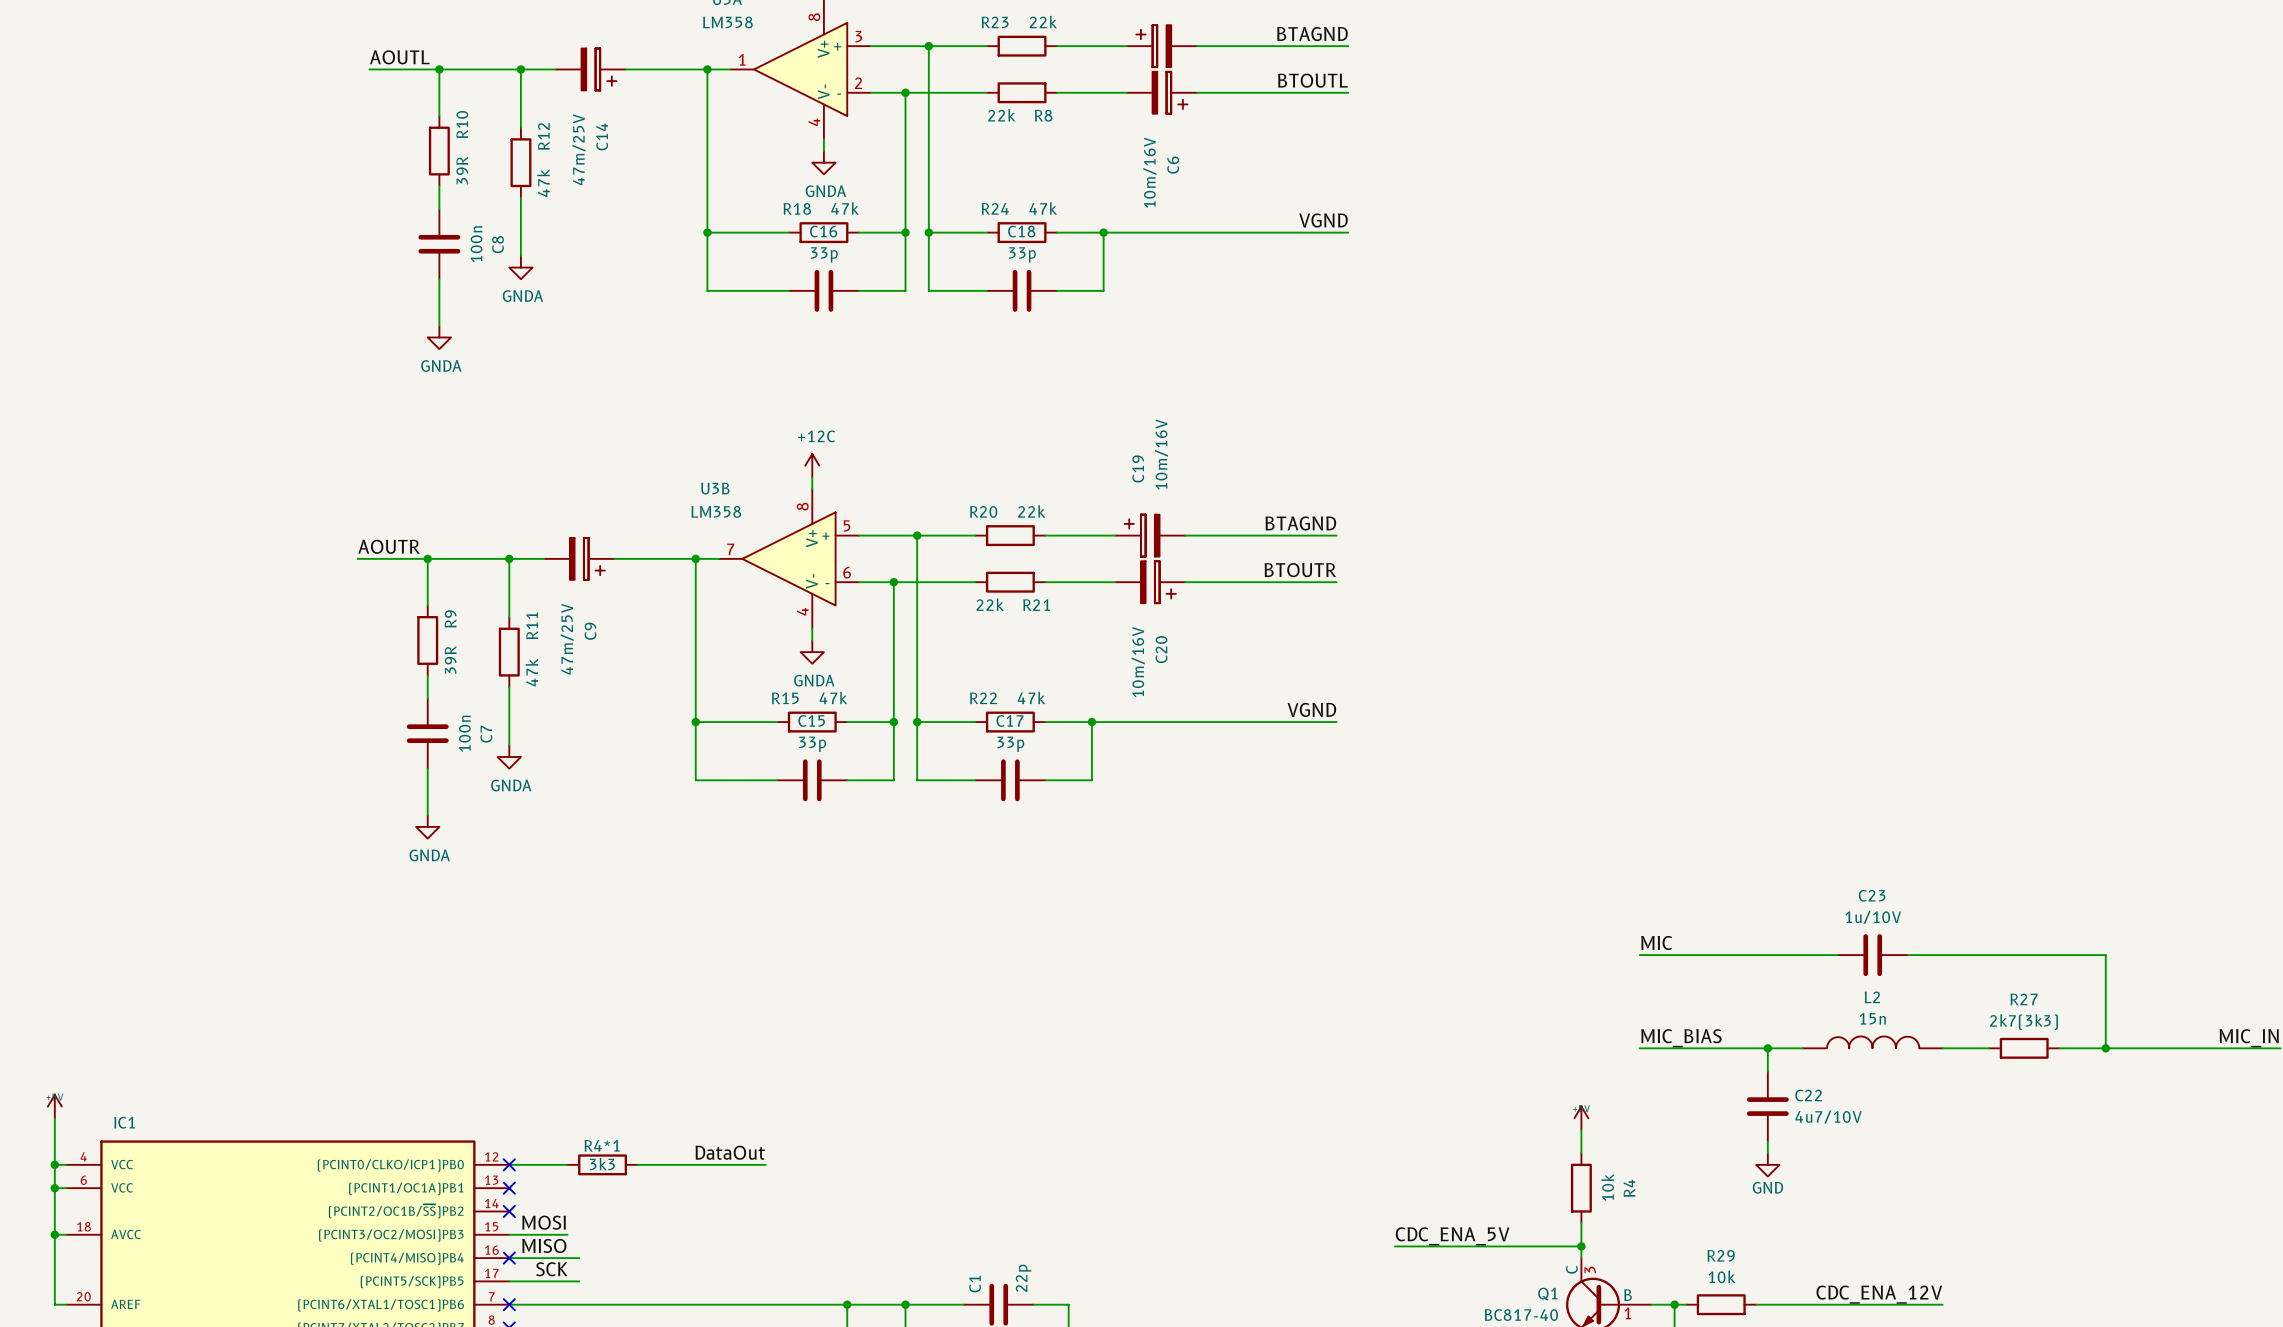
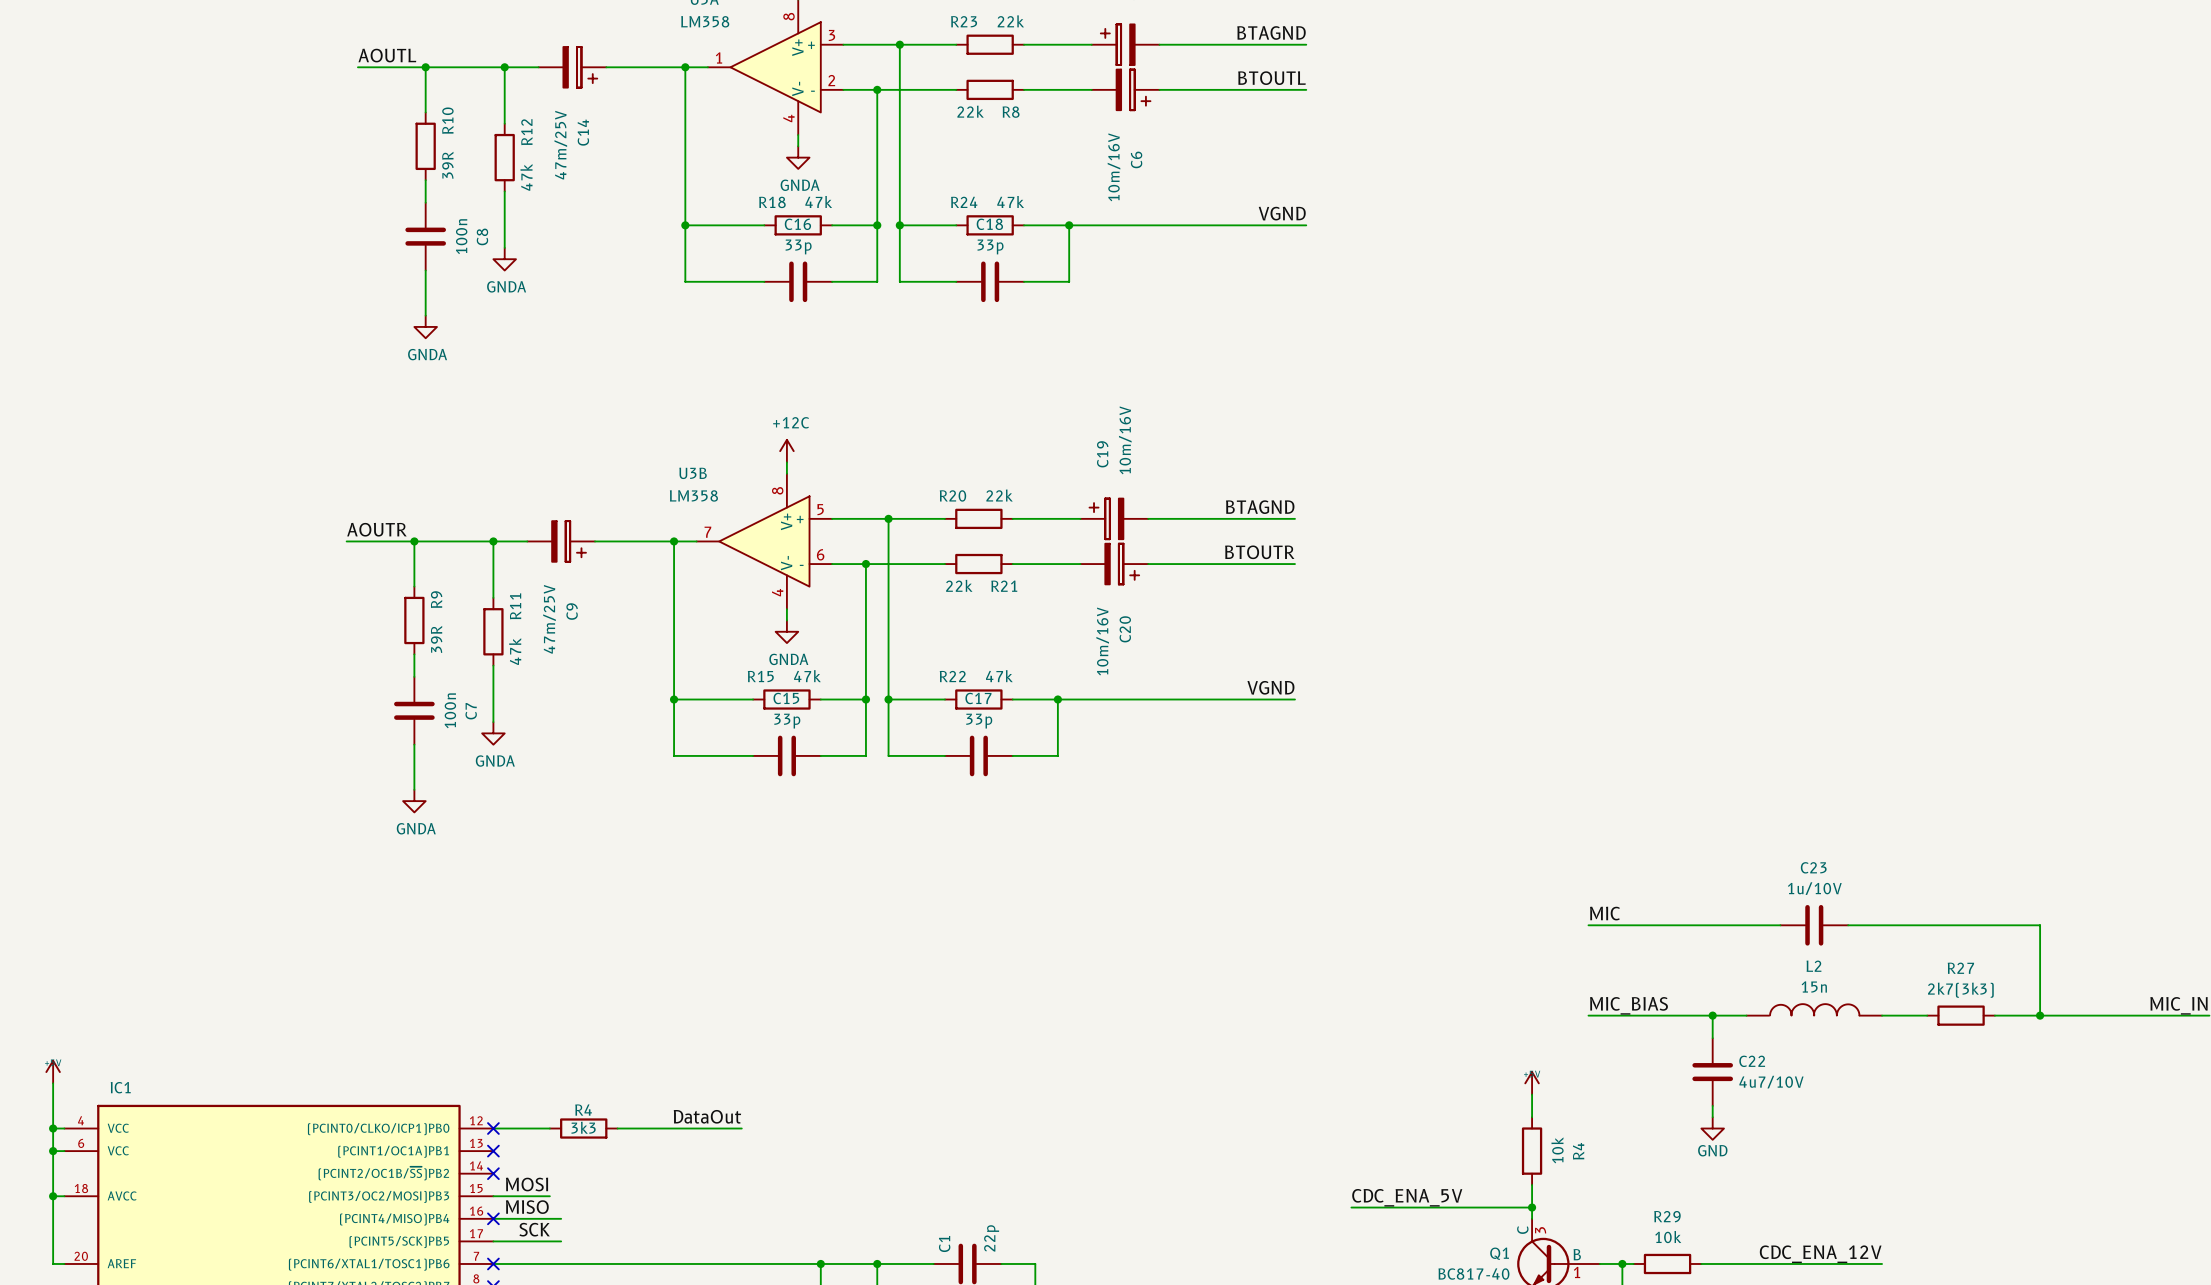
R4*1 name: R4*1 (602, 1145) -> R4 (583, 1110)

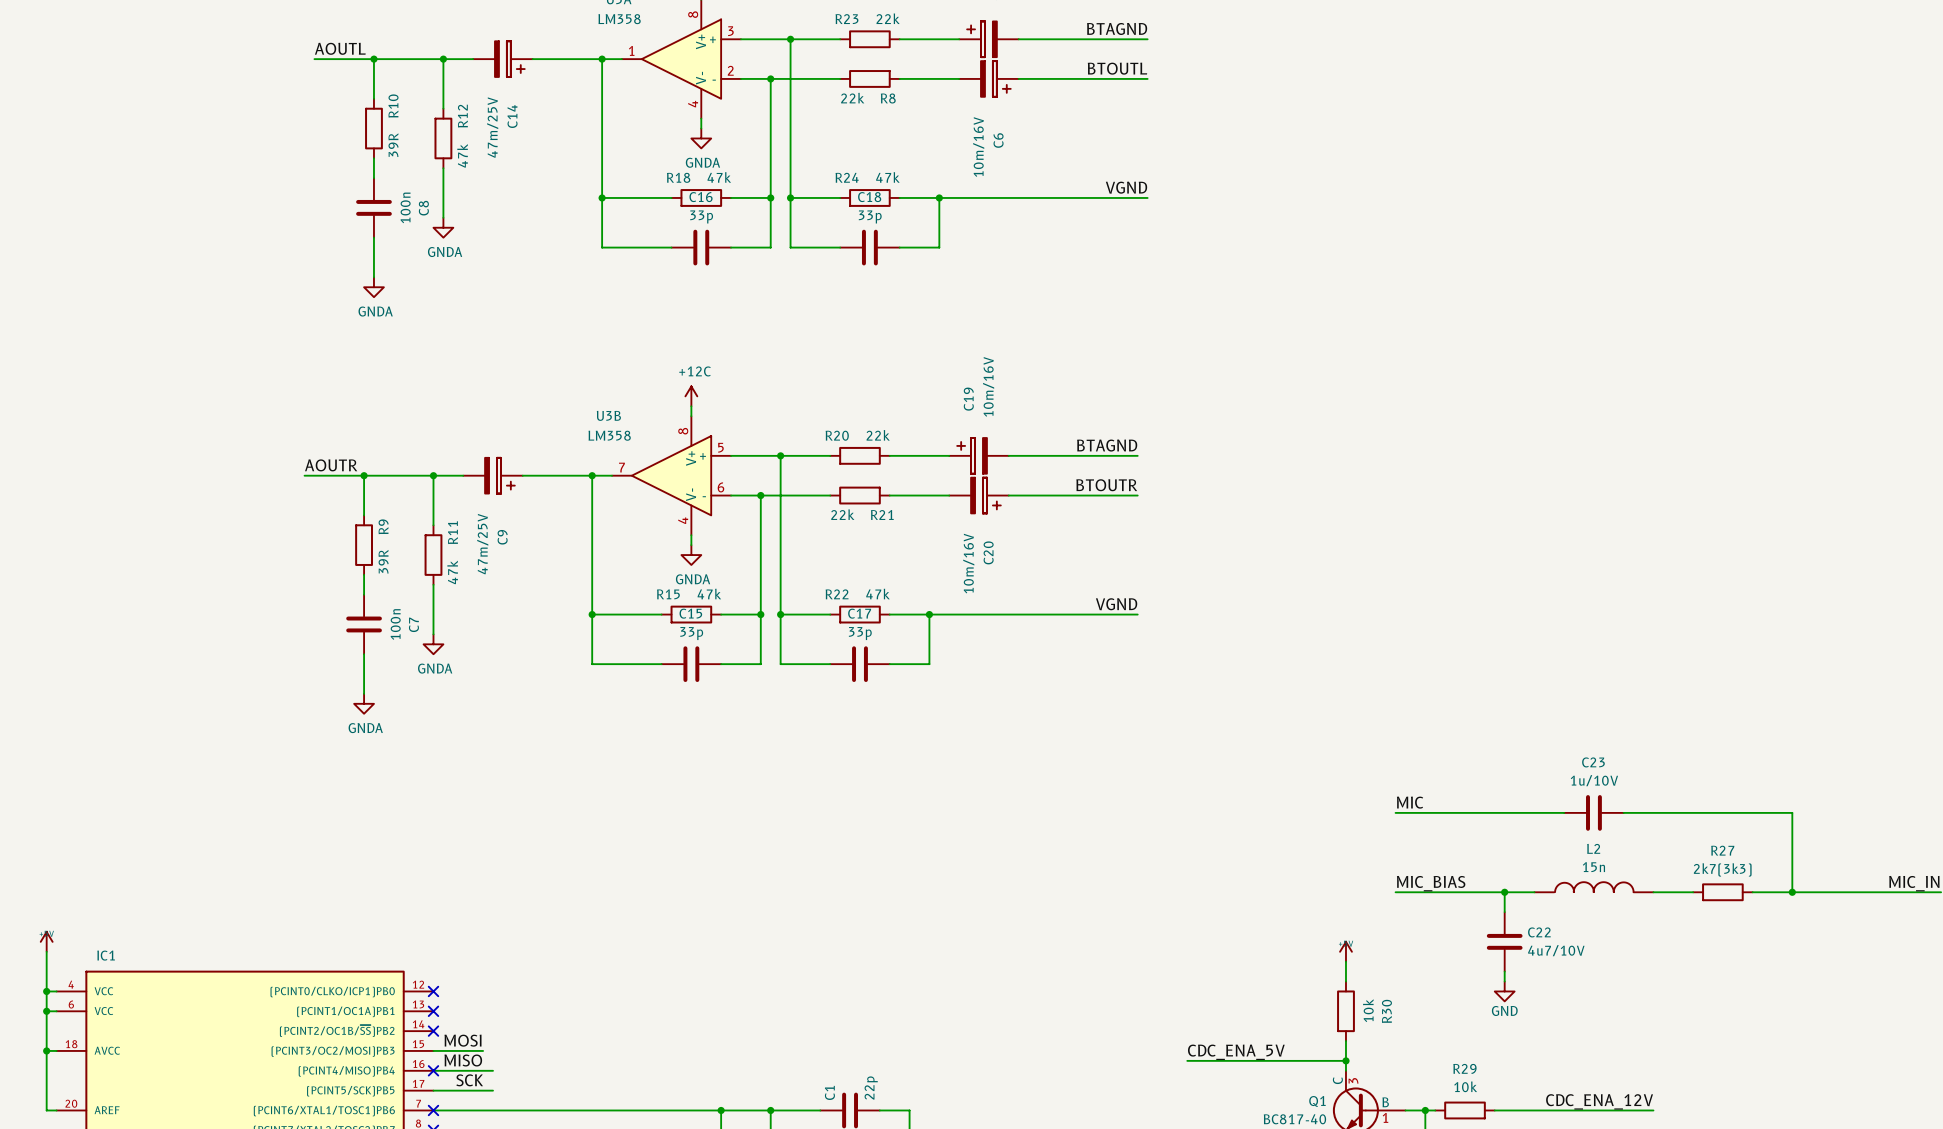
label: DataOut (707, 1116) -> none
wire: (493, 1128) (549, 1128) -> none
R4: 3k3 (583, 1128) -> none
wire: (617, 1128) (741, 1128) -> none
R4 name: R4 (1578, 1151) -> R30 (1386, 1011)

